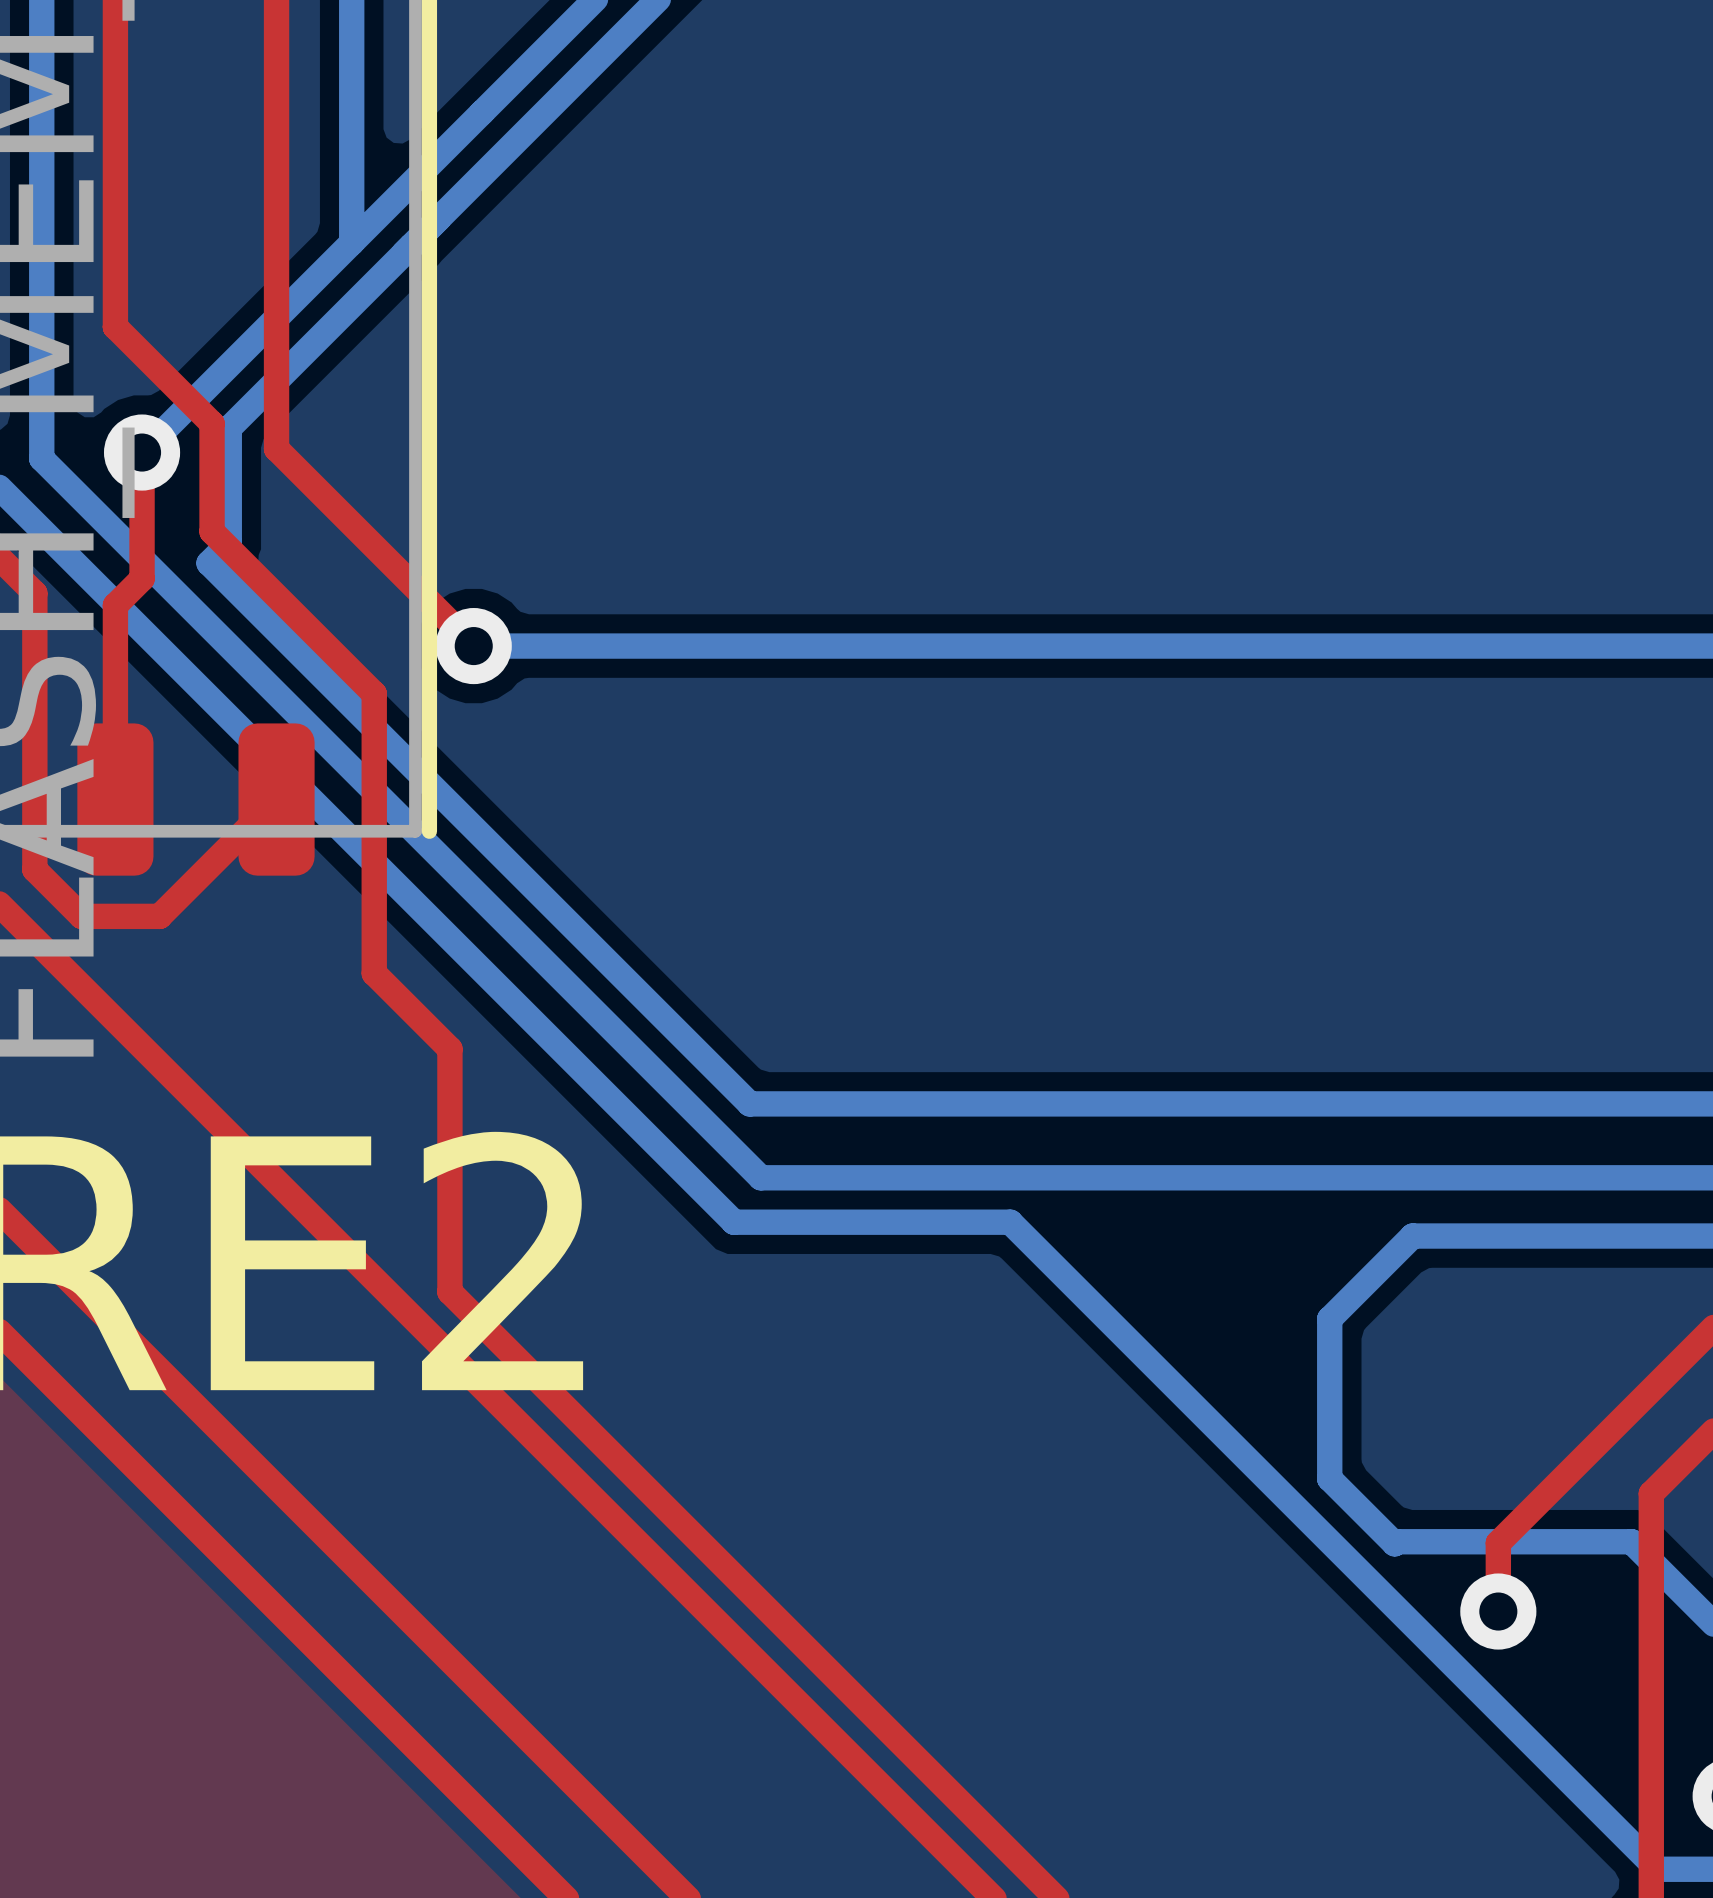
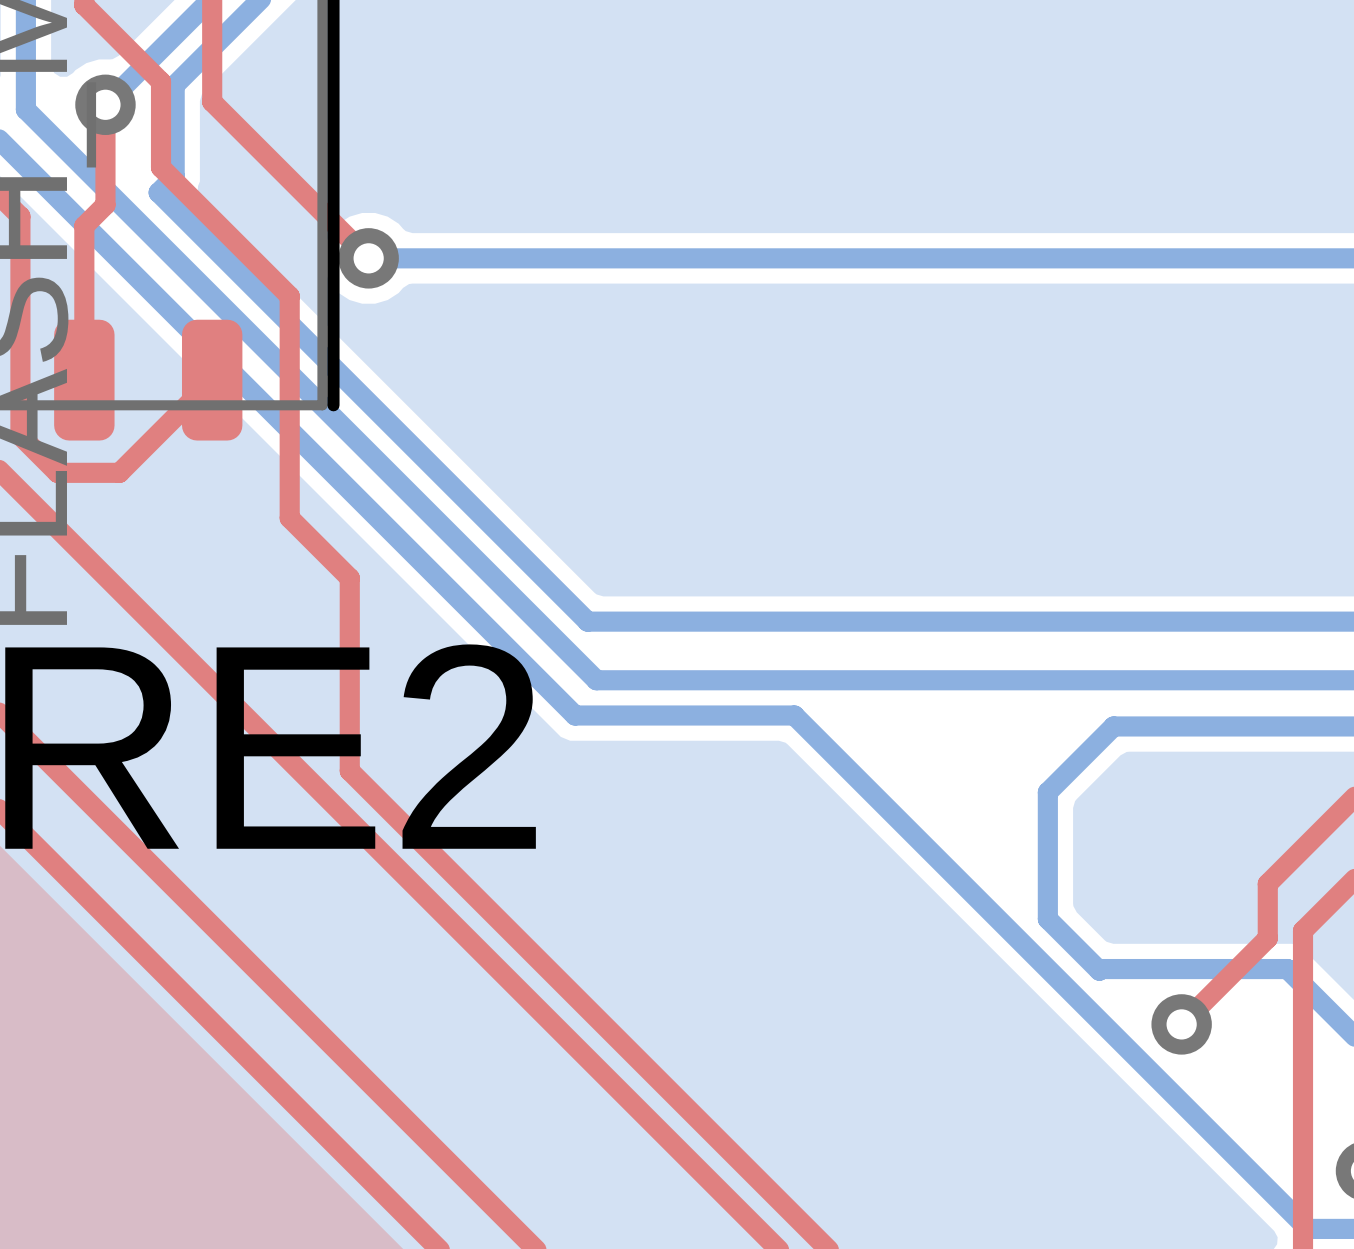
top track: (1606, 1434) (1498, 1543) (1498, 1611) -> (1267, 883) (1267, 938) (1181, 1024)

